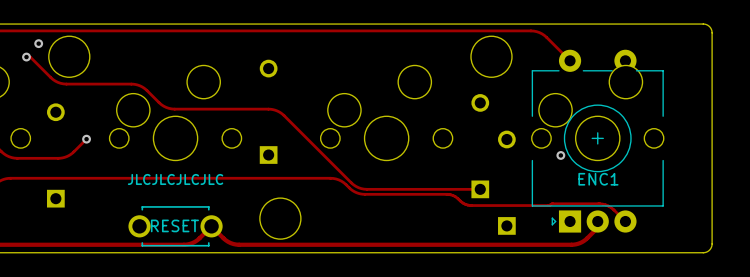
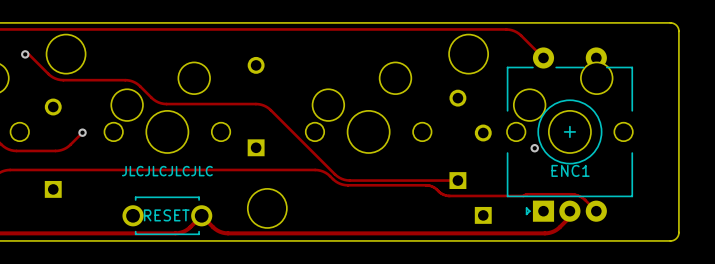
via: (38, 43) -> none

